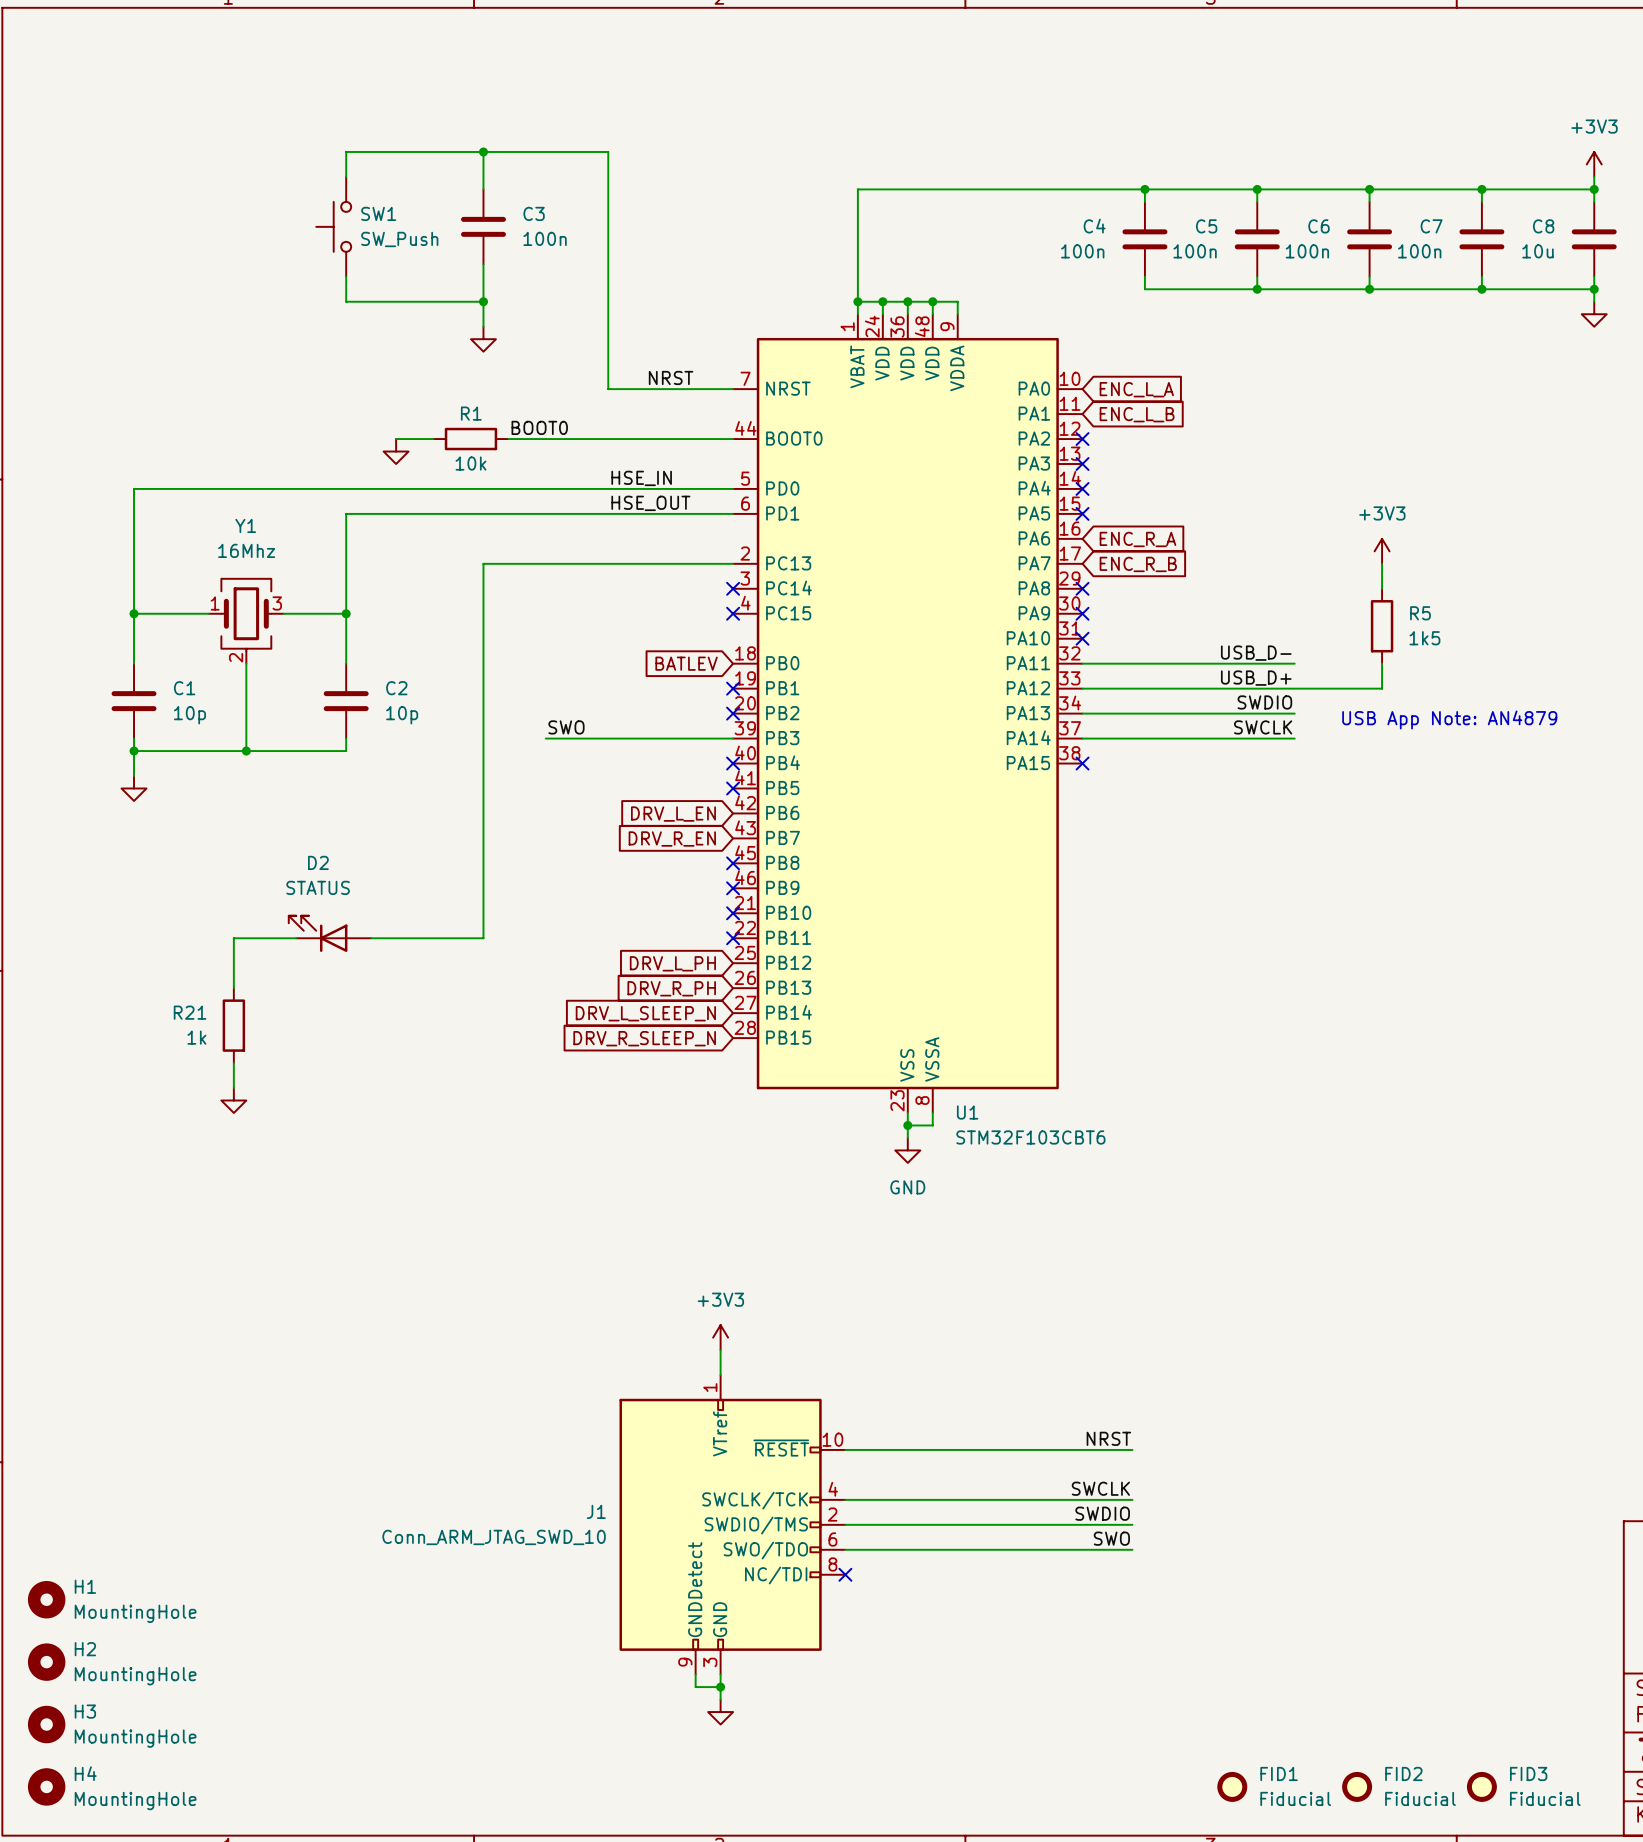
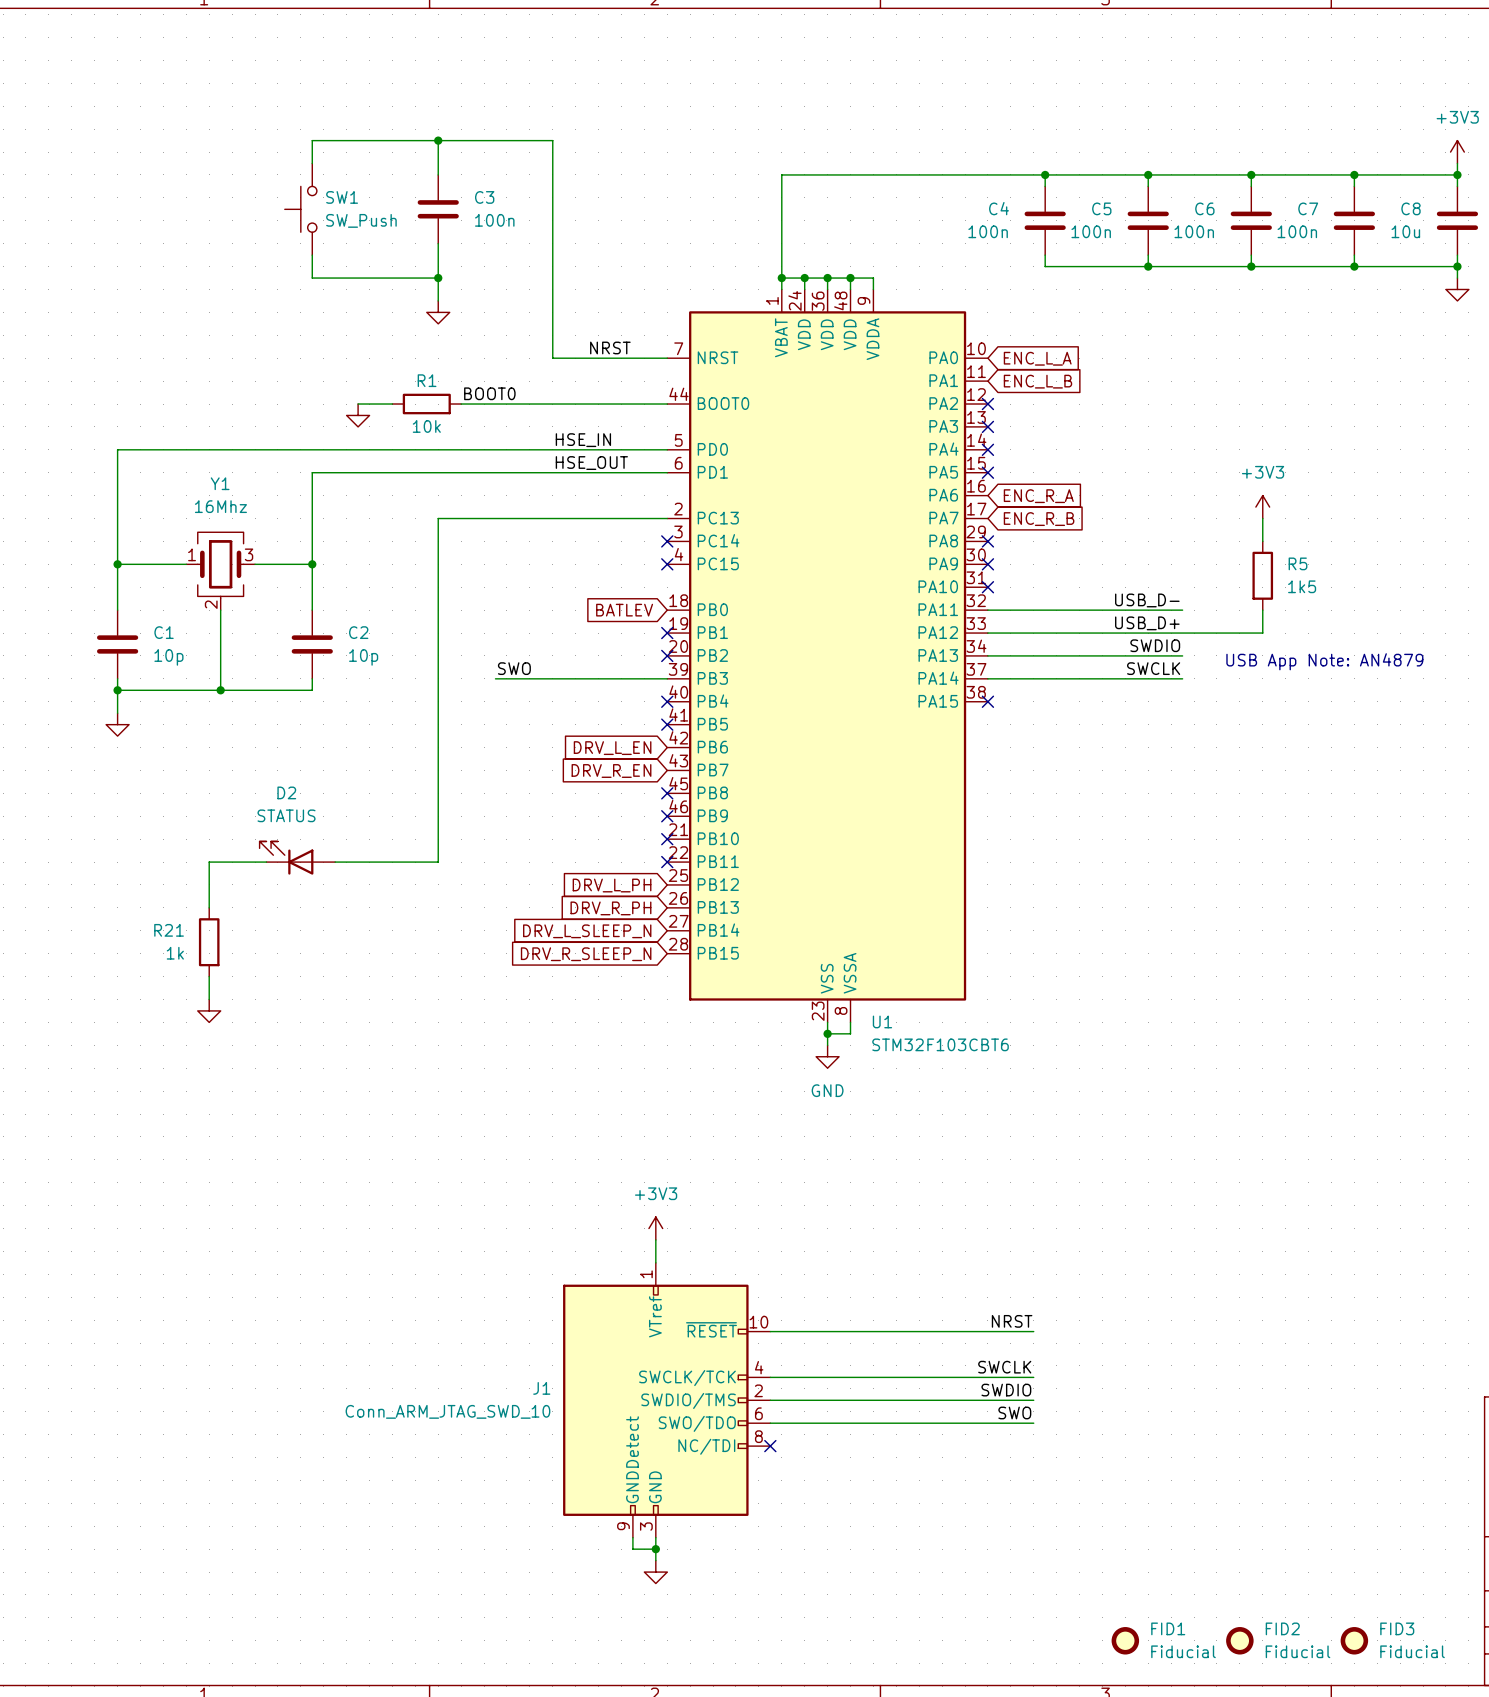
H1: MountingHole (46, 1599) -> none
H2: MountingHole (46, 1662) -> none
H3: MountingHole (46, 1724) -> none
H4: MountingHole (46, 1786) -> none

